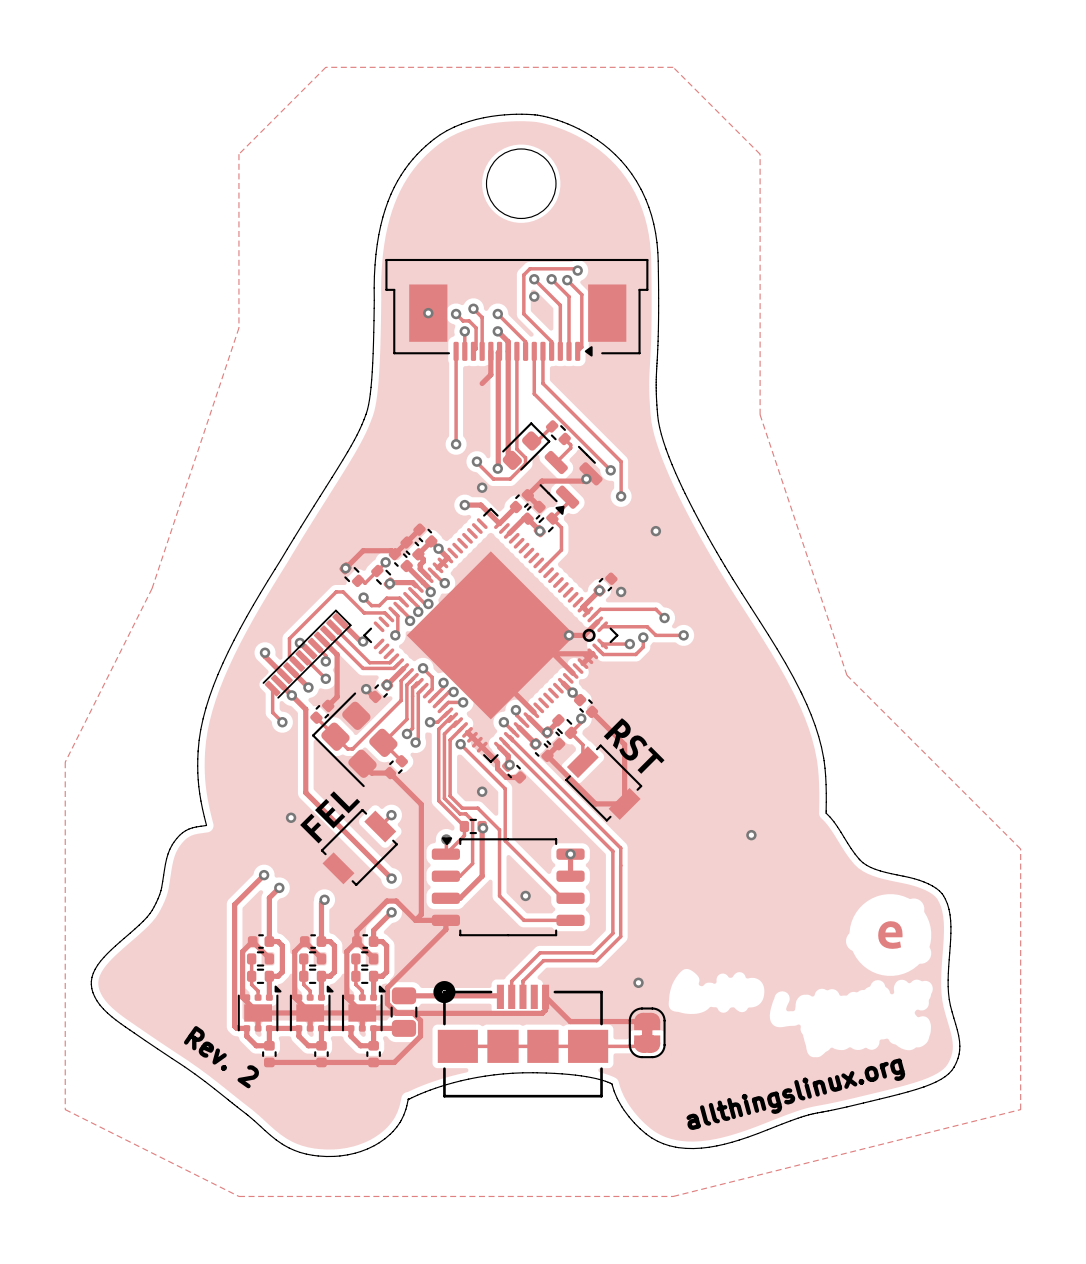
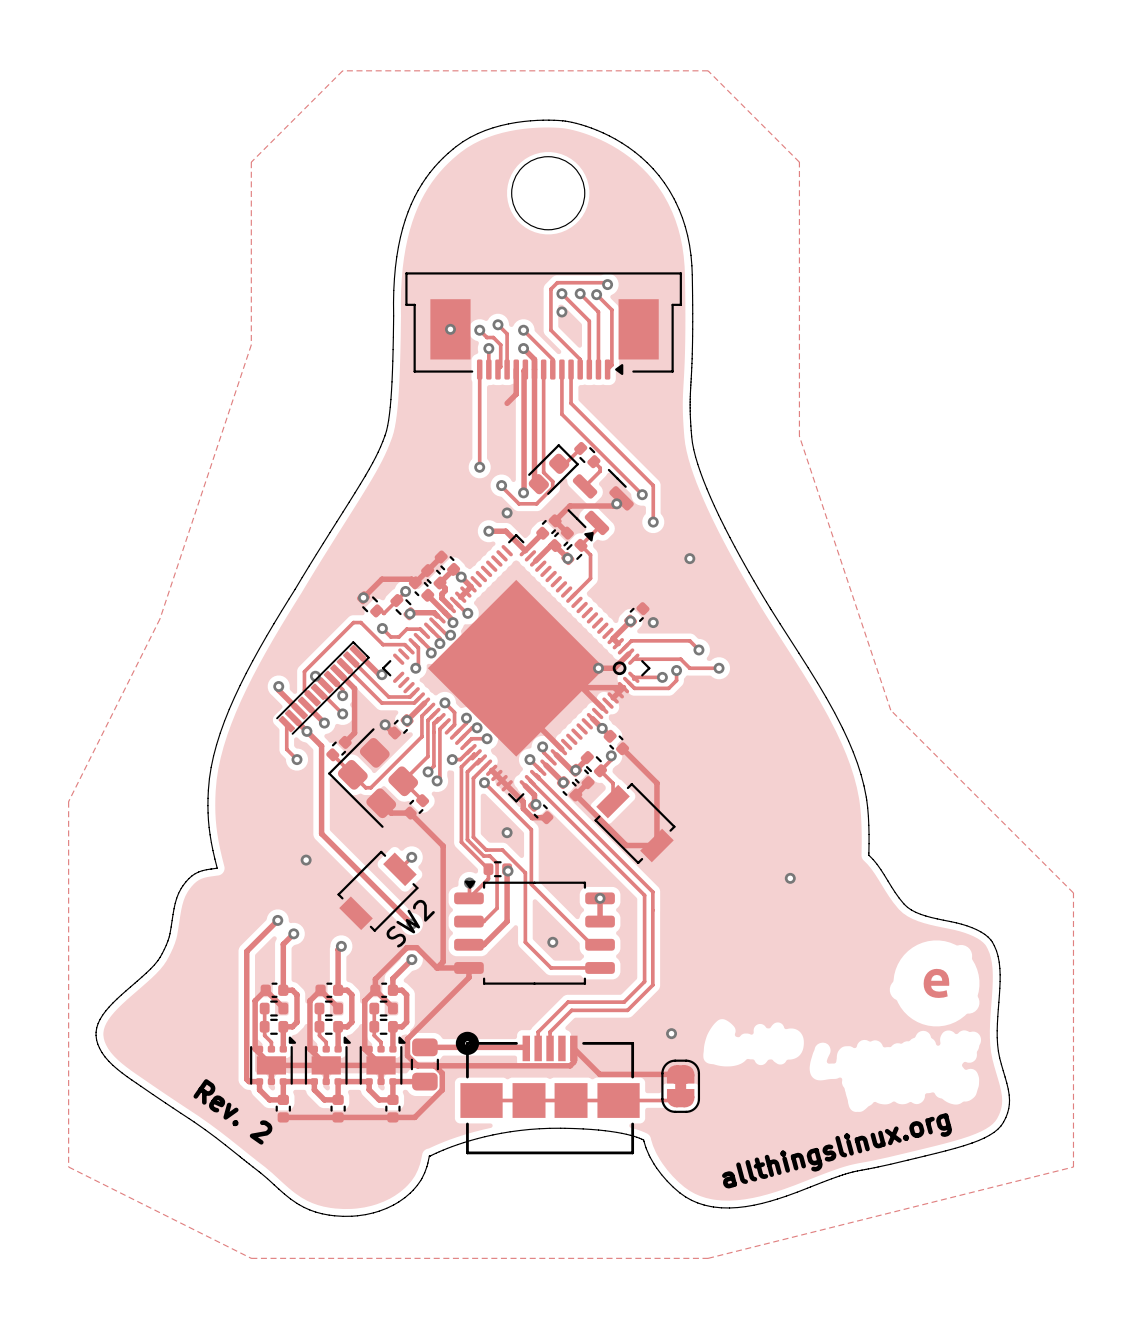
drawing: [603, 718, 665, 774] -> none
drawing: [300, 791, 361, 844] -> none
SW2 name: none -> SW2 (410, 923)

